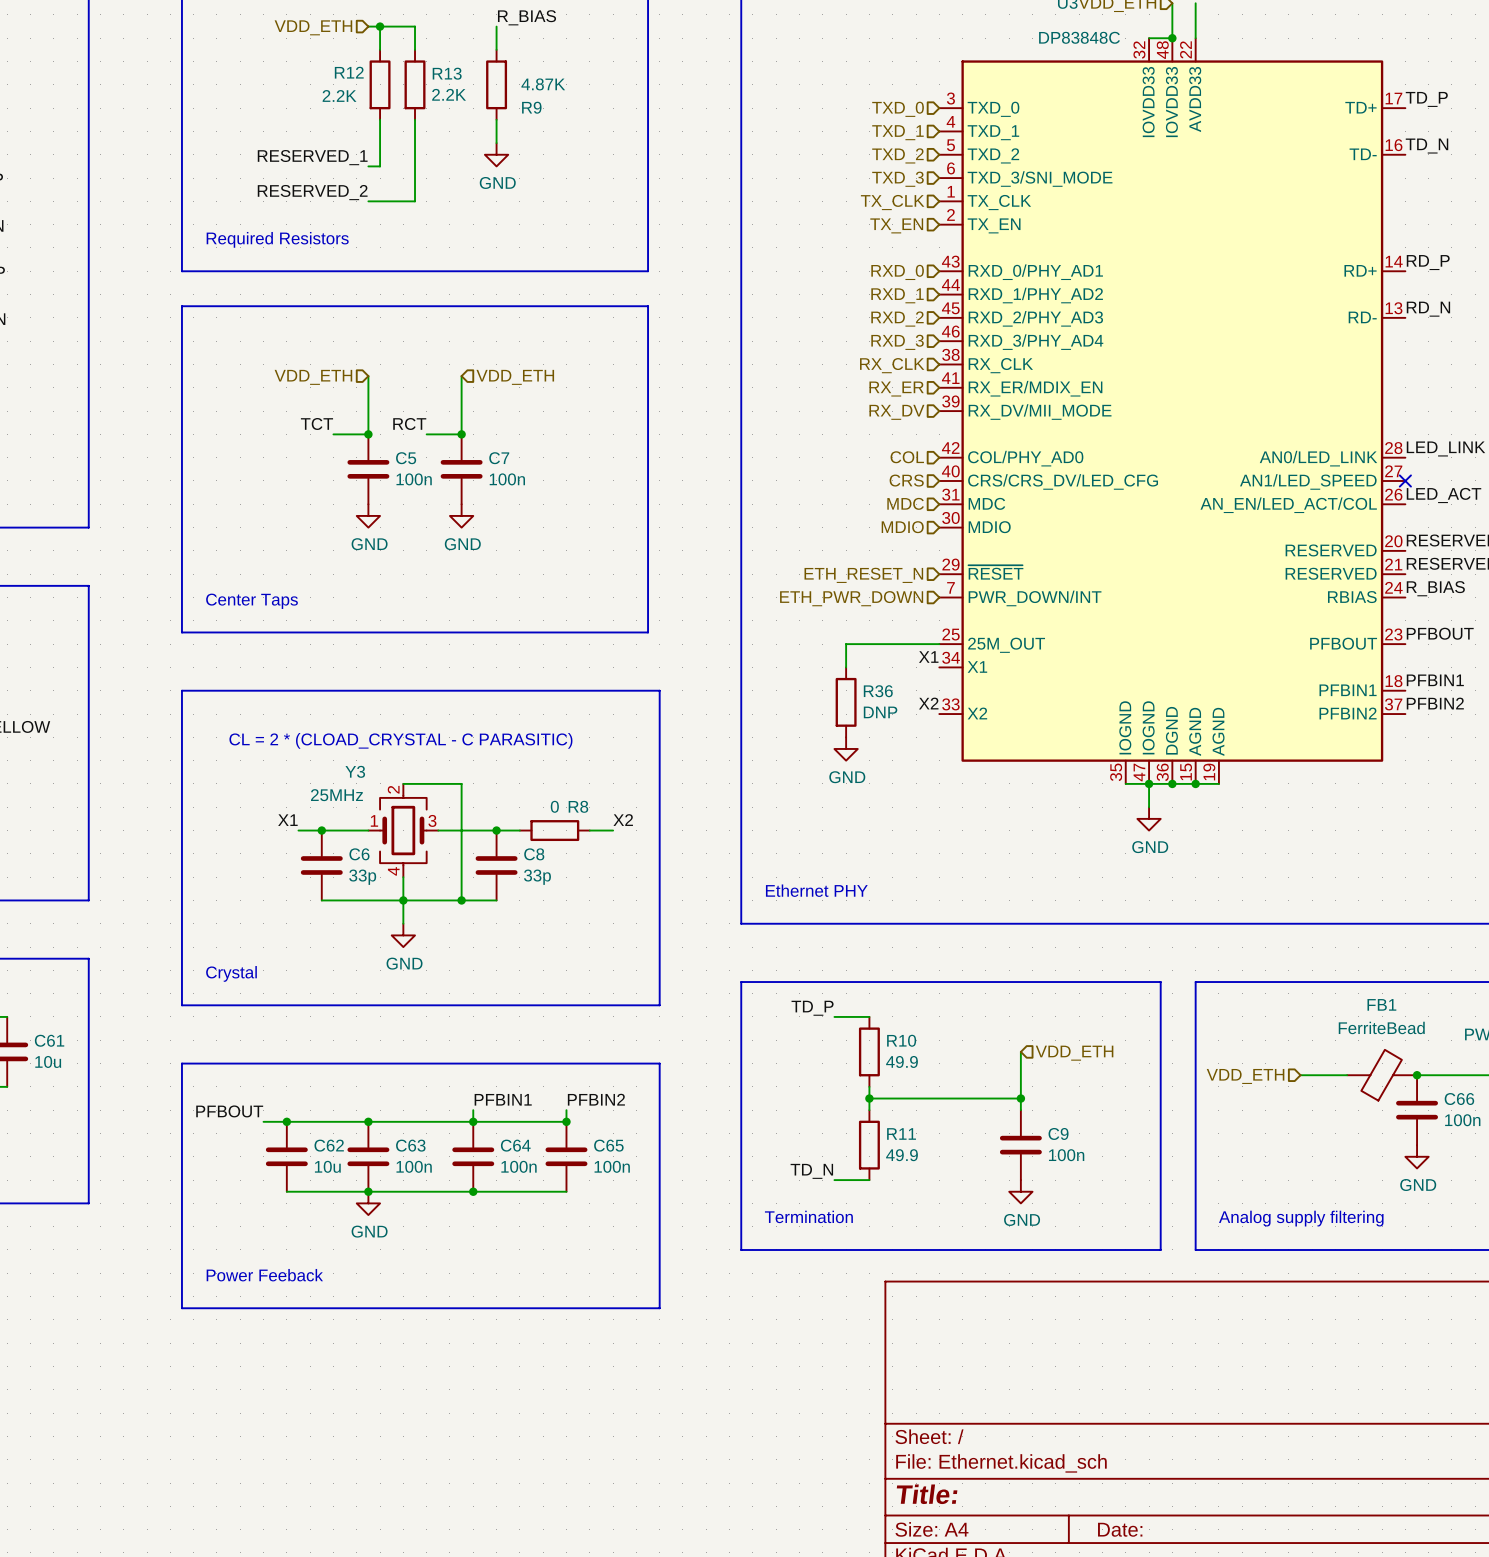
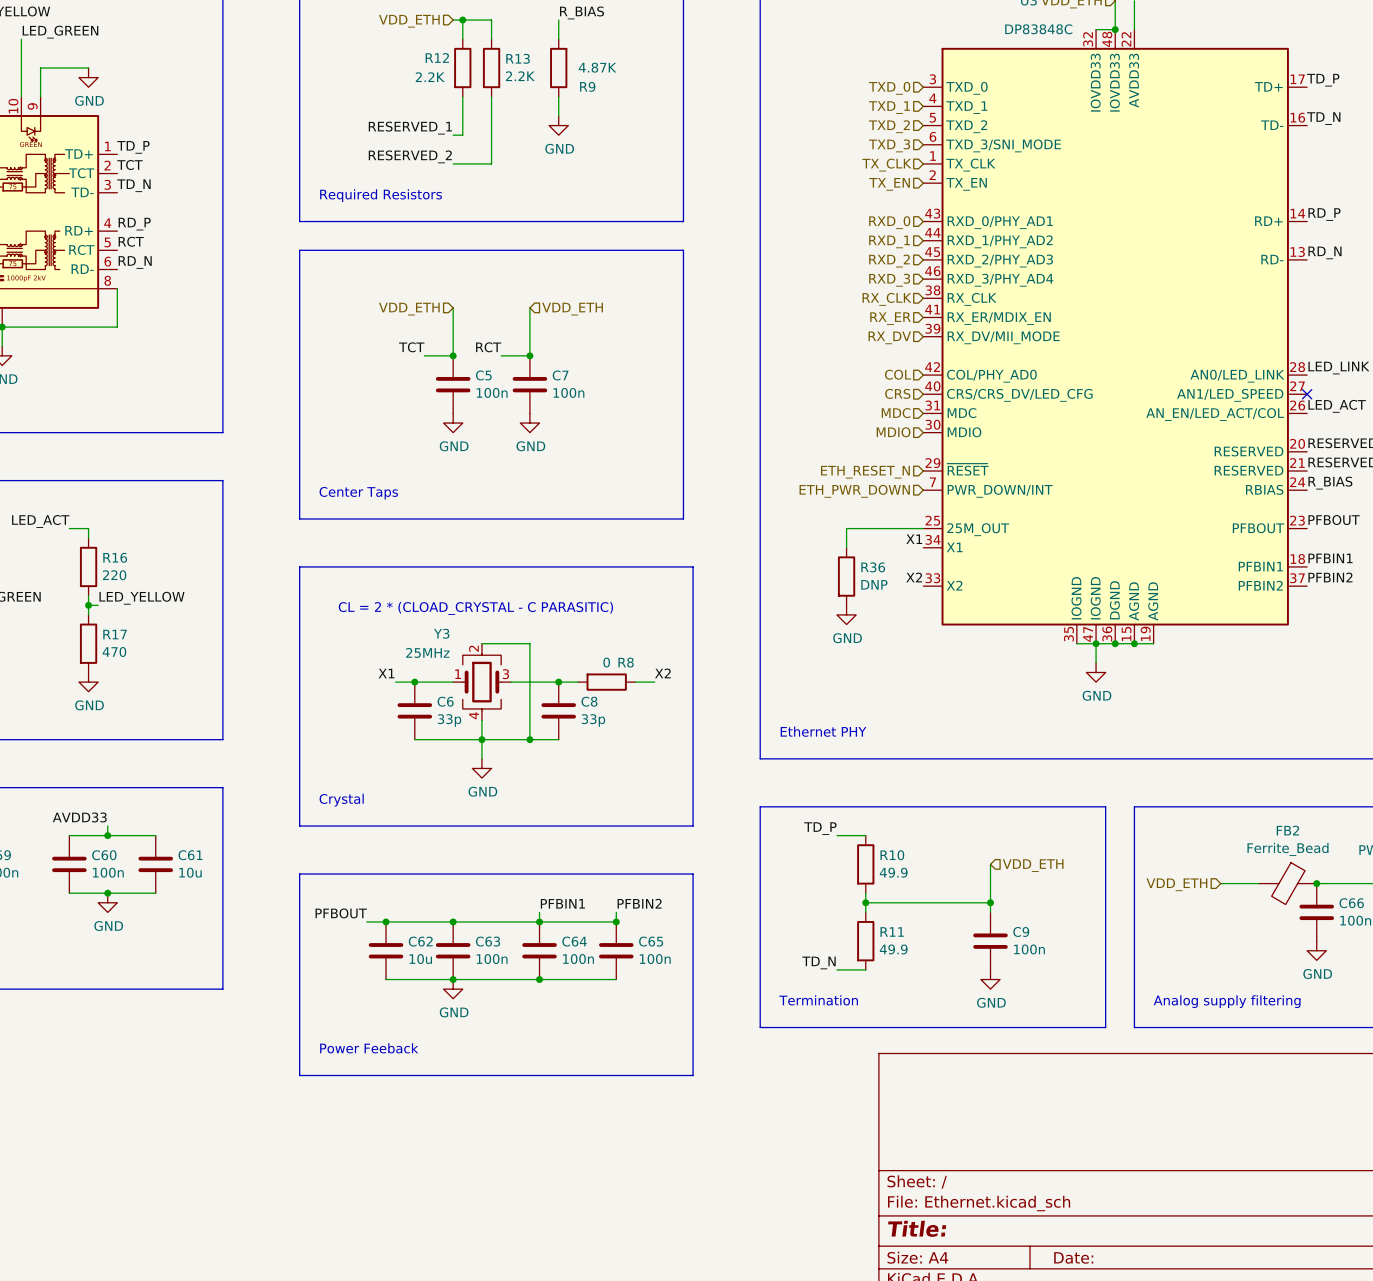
FB1: FerriteBead (1382, 1075) -> none
FB2: none -> Ferrite_Bead (1287, 883)

